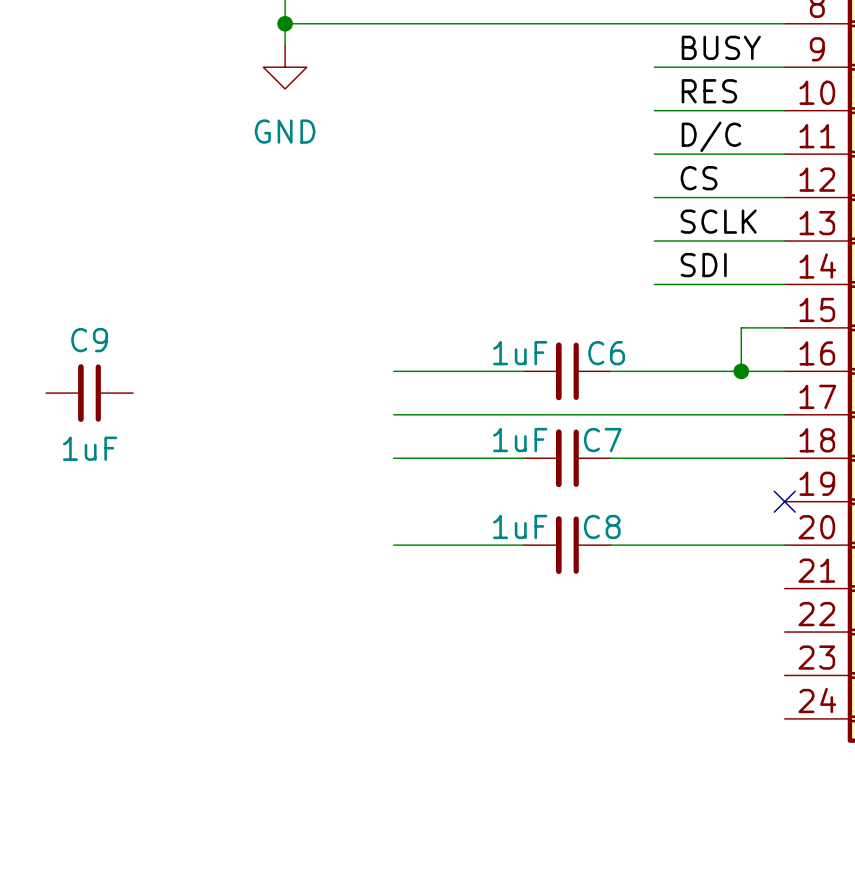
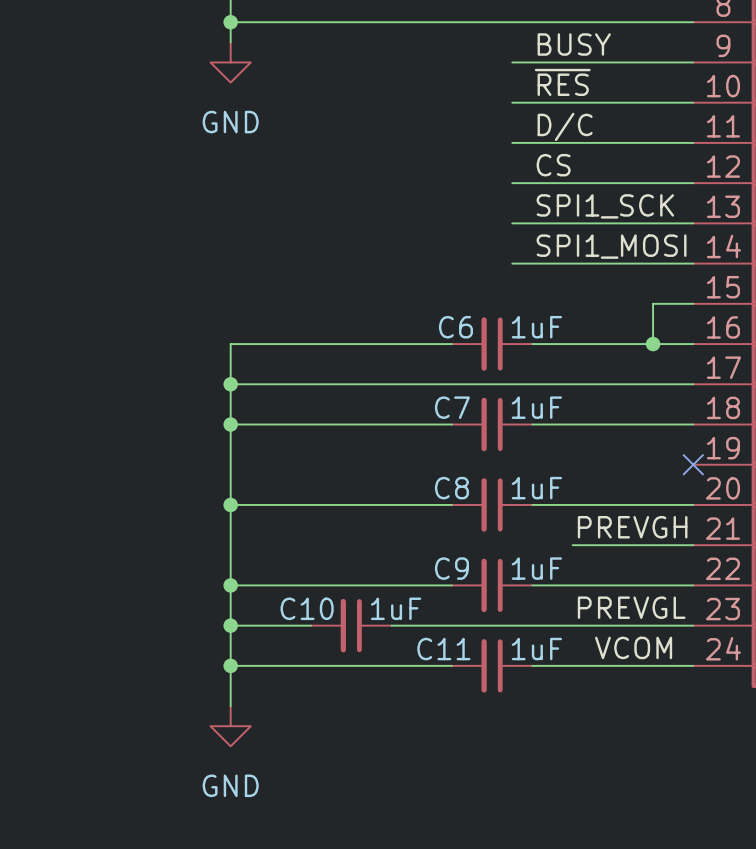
label position: BUSY (721, 47) -> BUSY (574, 44)
wire: none -> (512, 62) (572, 62)
label: RES (709, 91) -> ~{RES} (562, 82)
wire: none -> (512, 102) (572, 102)
label position: D/C (711, 136) -> D/C (565, 126)
wire: none -> (512, 142) (572, 142)
label position: CS (699, 178) -> CS (553, 165)
wire: none -> (512, 183) (572, 183)
label: SCLK (718, 221) -> none
label: none -> SPI1_SCK (605, 206)
wire: none -> (512, 223) (572, 223)
label: SDI (703, 265) -> none
label: none -> SPI1_MOSI (611, 246)
wire: none -> (512, 263) (572, 263)
C9 name position: C9 (89, 340) -> C9 (451, 568)
C6 value position: 1uF (520, 353) -> 1uF (536, 327)
C6 name position: C6 (606, 353) -> C6 (455, 327)
wire: none -> (331, 344) (230, 344) (230, 706)
C9 position: (89, 393) -> (492, 585)
wire: none -> (230, 384) (331, 384)
junction: none -> (230, 384)
C7 value position: 1uF (520, 440) -> 1uF (536, 407)
C7 name position: C7 (602, 440) -> C7 (452, 407)
C9 value position: 1uF (90, 448) -> 1uF (536, 568)
wire: none -> (230, 424) (331, 424)
junction: none -> (230, 424)
C8 value position: 1uF (520, 526) -> 1uF (536, 488)
C8 name position: C8 (602, 526) -> C8 (451, 488)
wire: none -> (230, 504) (331, 504)
junction: none -> (230, 504)
label: none -> PREVGH (632, 527)
wire: none -> (572, 545) (693, 545)
wire: none -> (230, 585) (451, 585)
junction: none -> (230, 585)
wire: none -> (532, 585) (693, 585)
label: none -> PREVGL (631, 607)
wire: none -> (230, 625) (311, 625)
junction: none -> (230, 625)
C10: none -> 1uF (351, 625)
wire: none -> (391, 625) (693, 625)
label: none -> VCOM (633, 647)
wire: none -> (230, 665) (451, 665)
junction: none -> (230, 665)
C11: none -> 1uF (492, 665)
wire: none -> (532, 665) (693, 665)
power symbol: none -> GND (230, 726)

